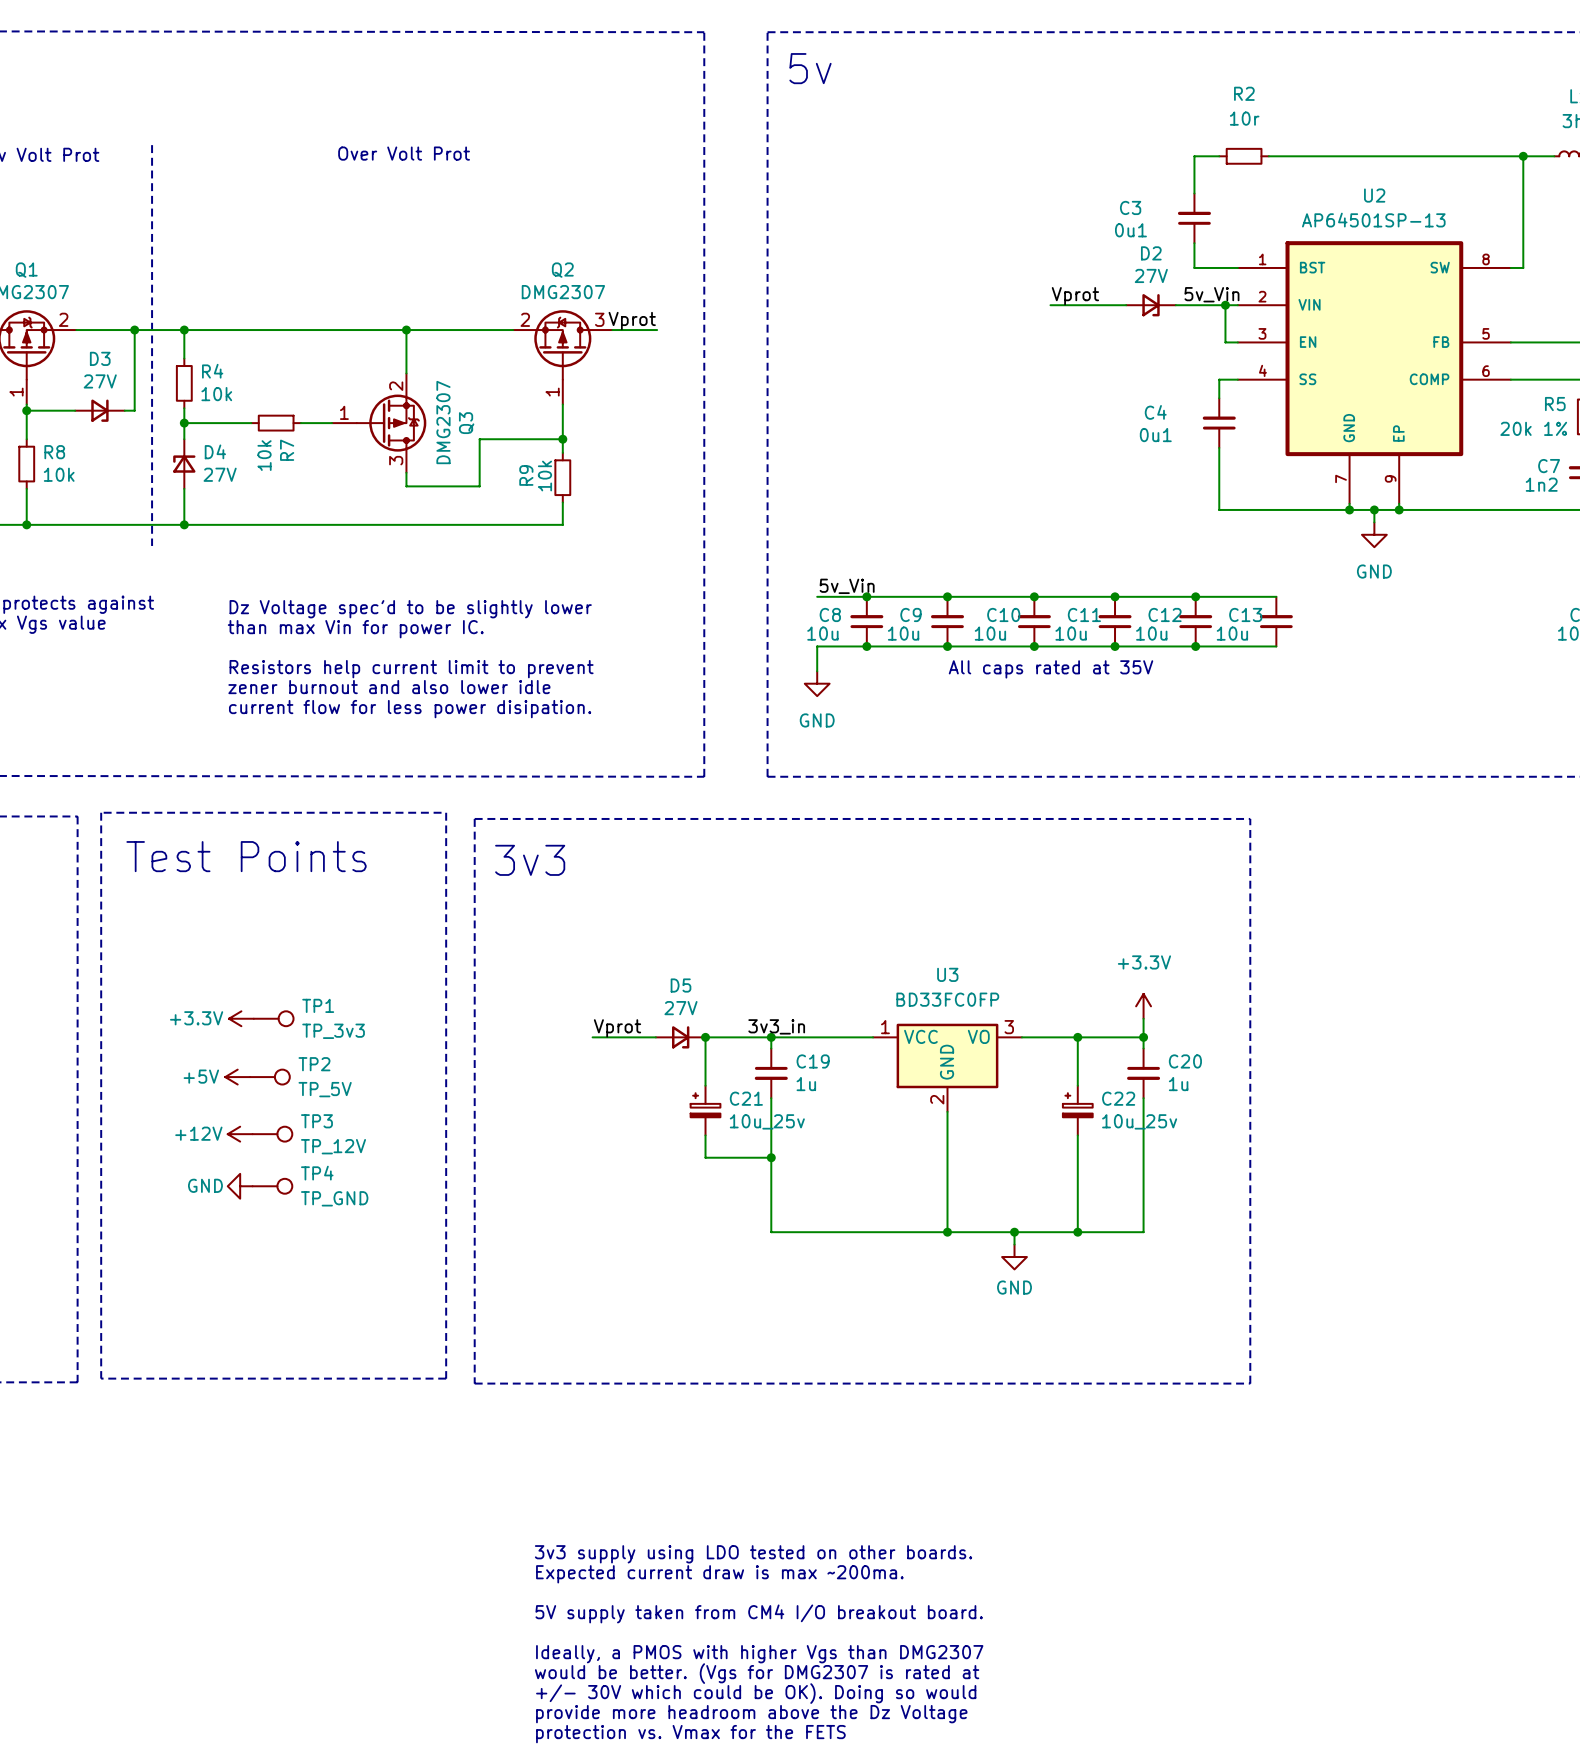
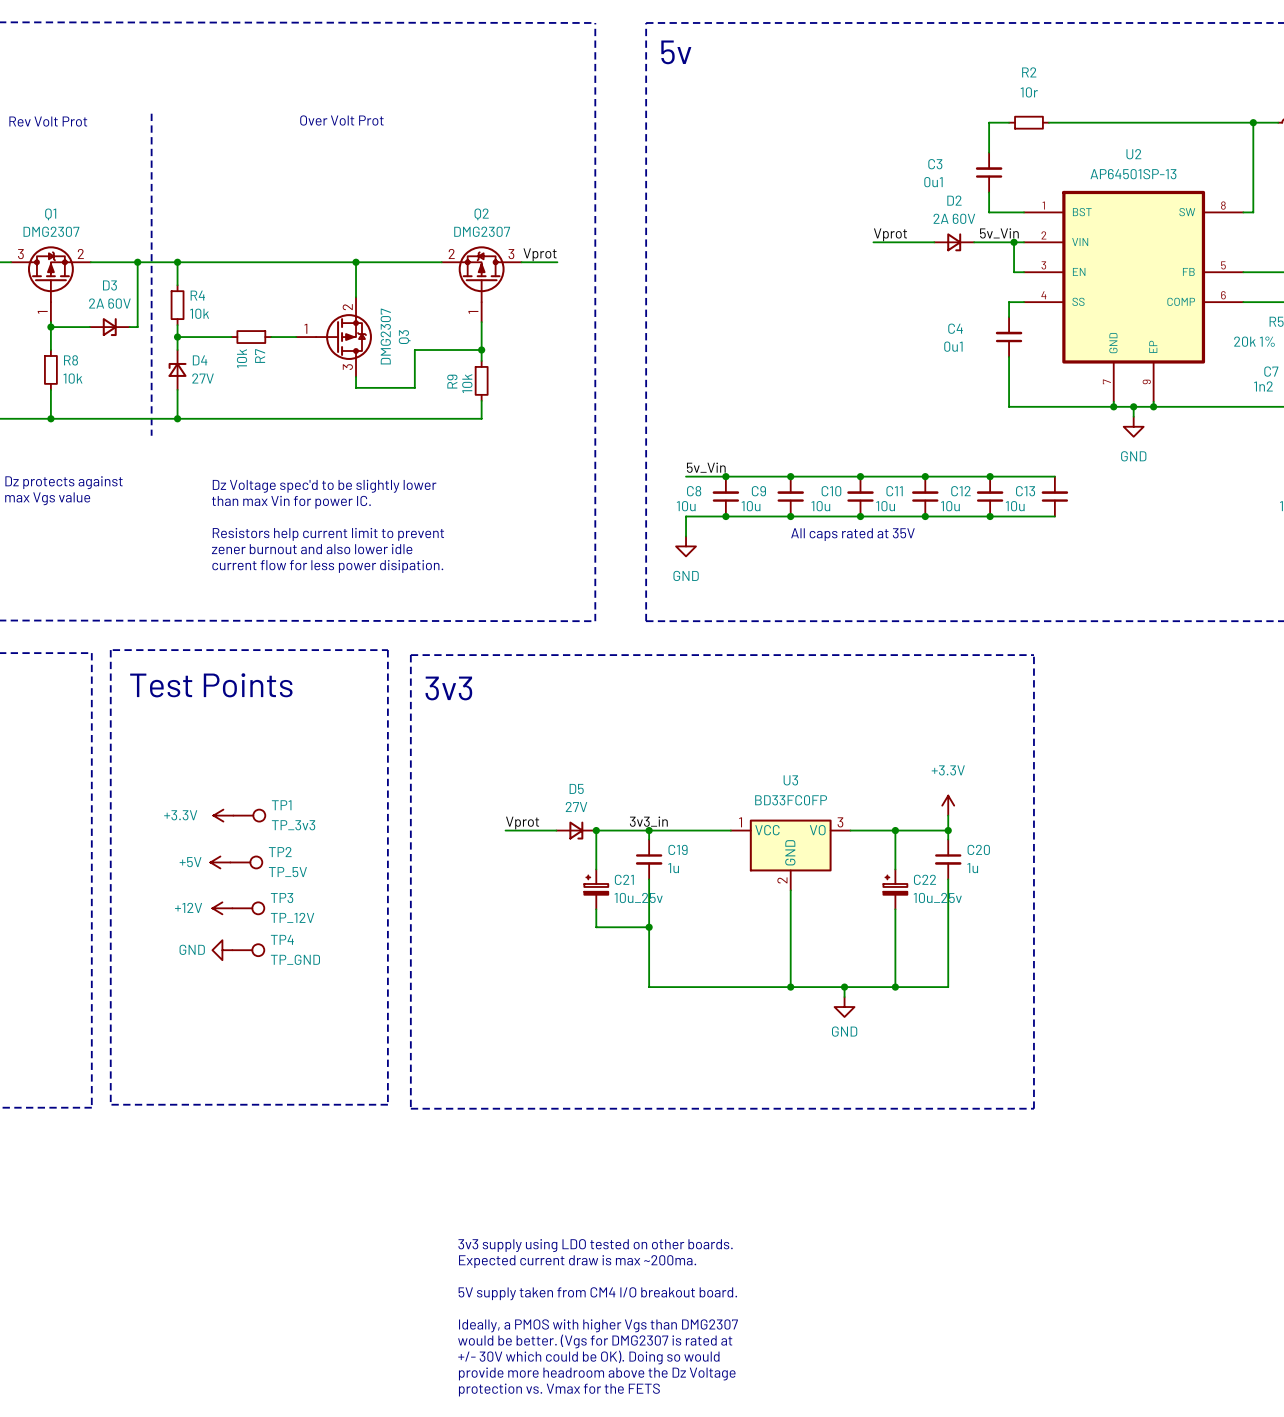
D2 value: 27V (1151, 275) -> 2A 60V (954, 218)
D3 value: 27V (100, 381) -> 2A 60V (109, 303)

